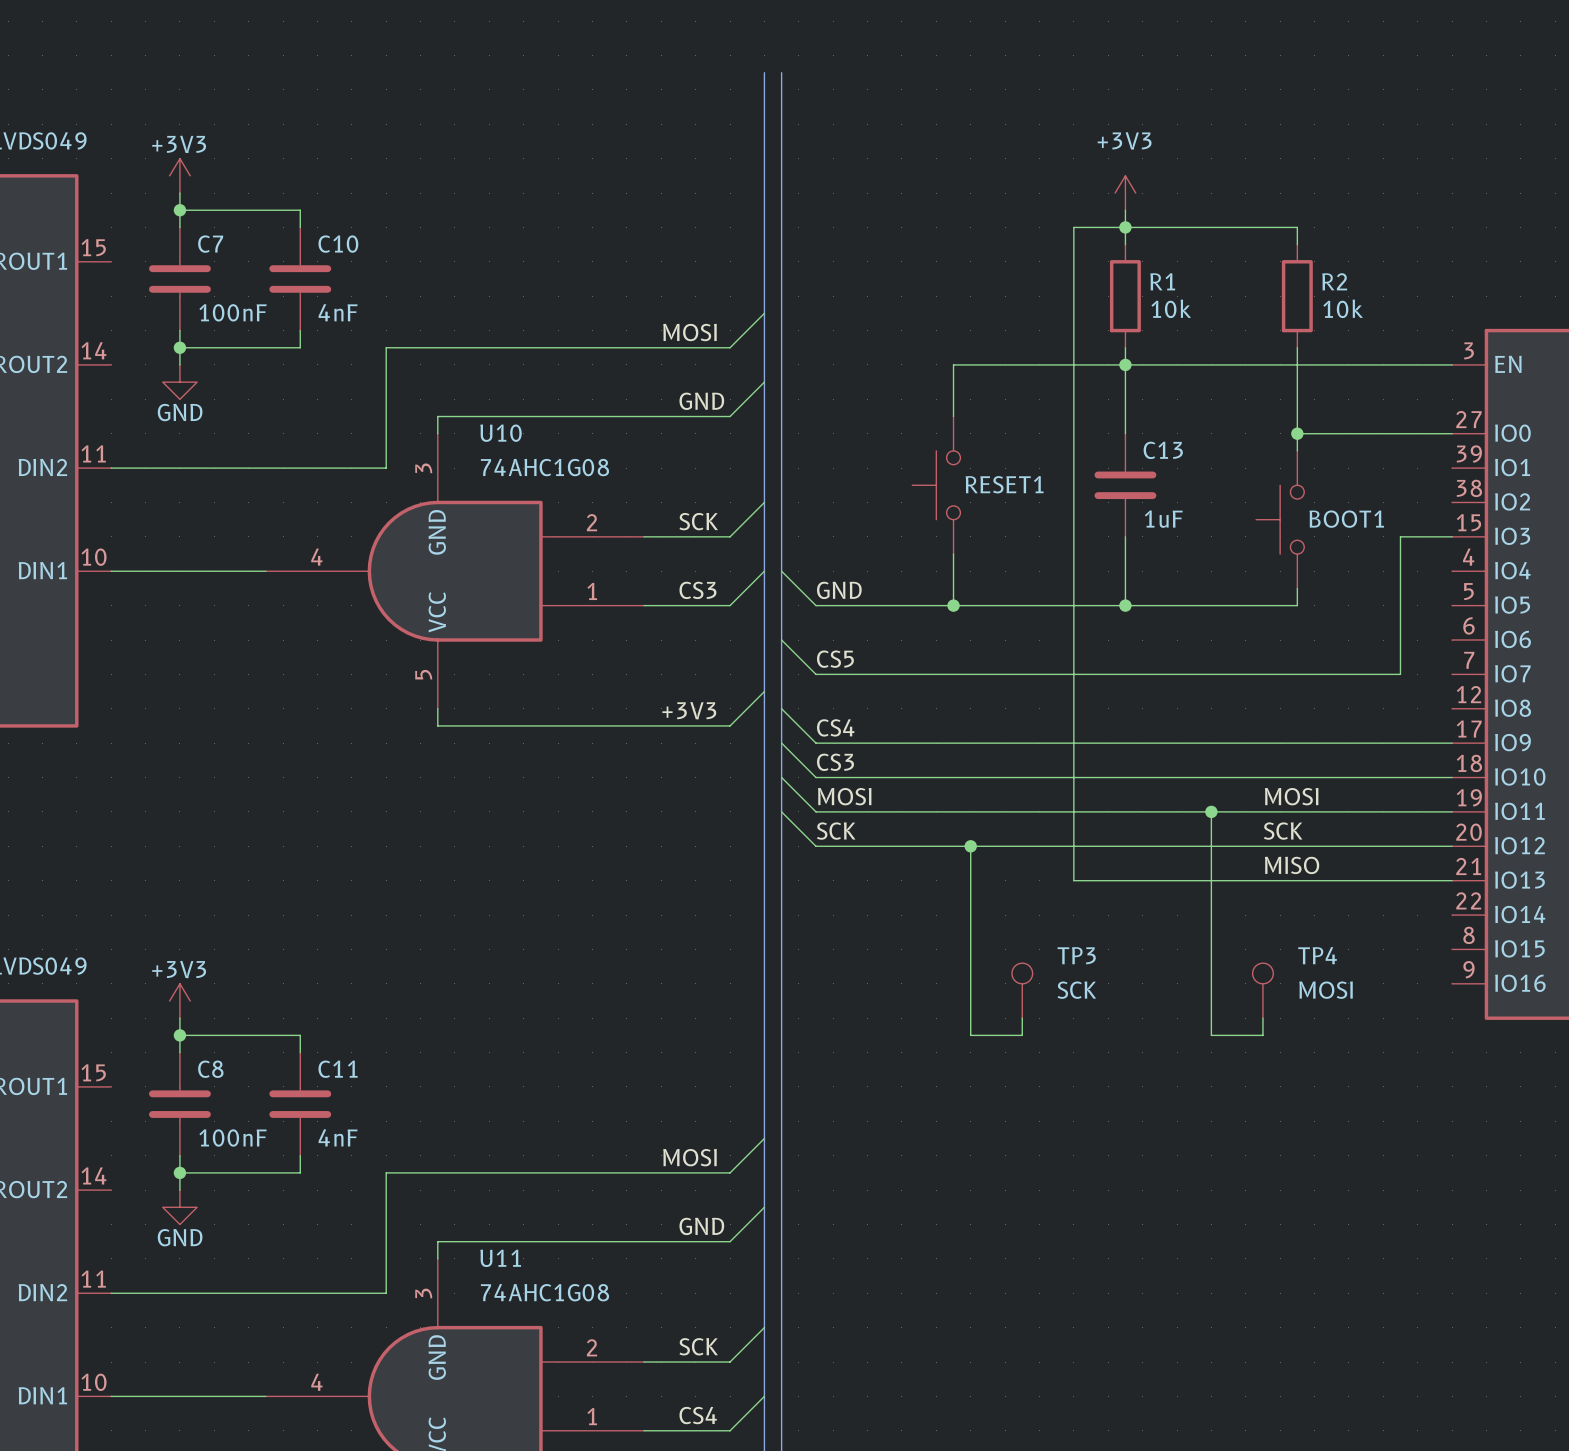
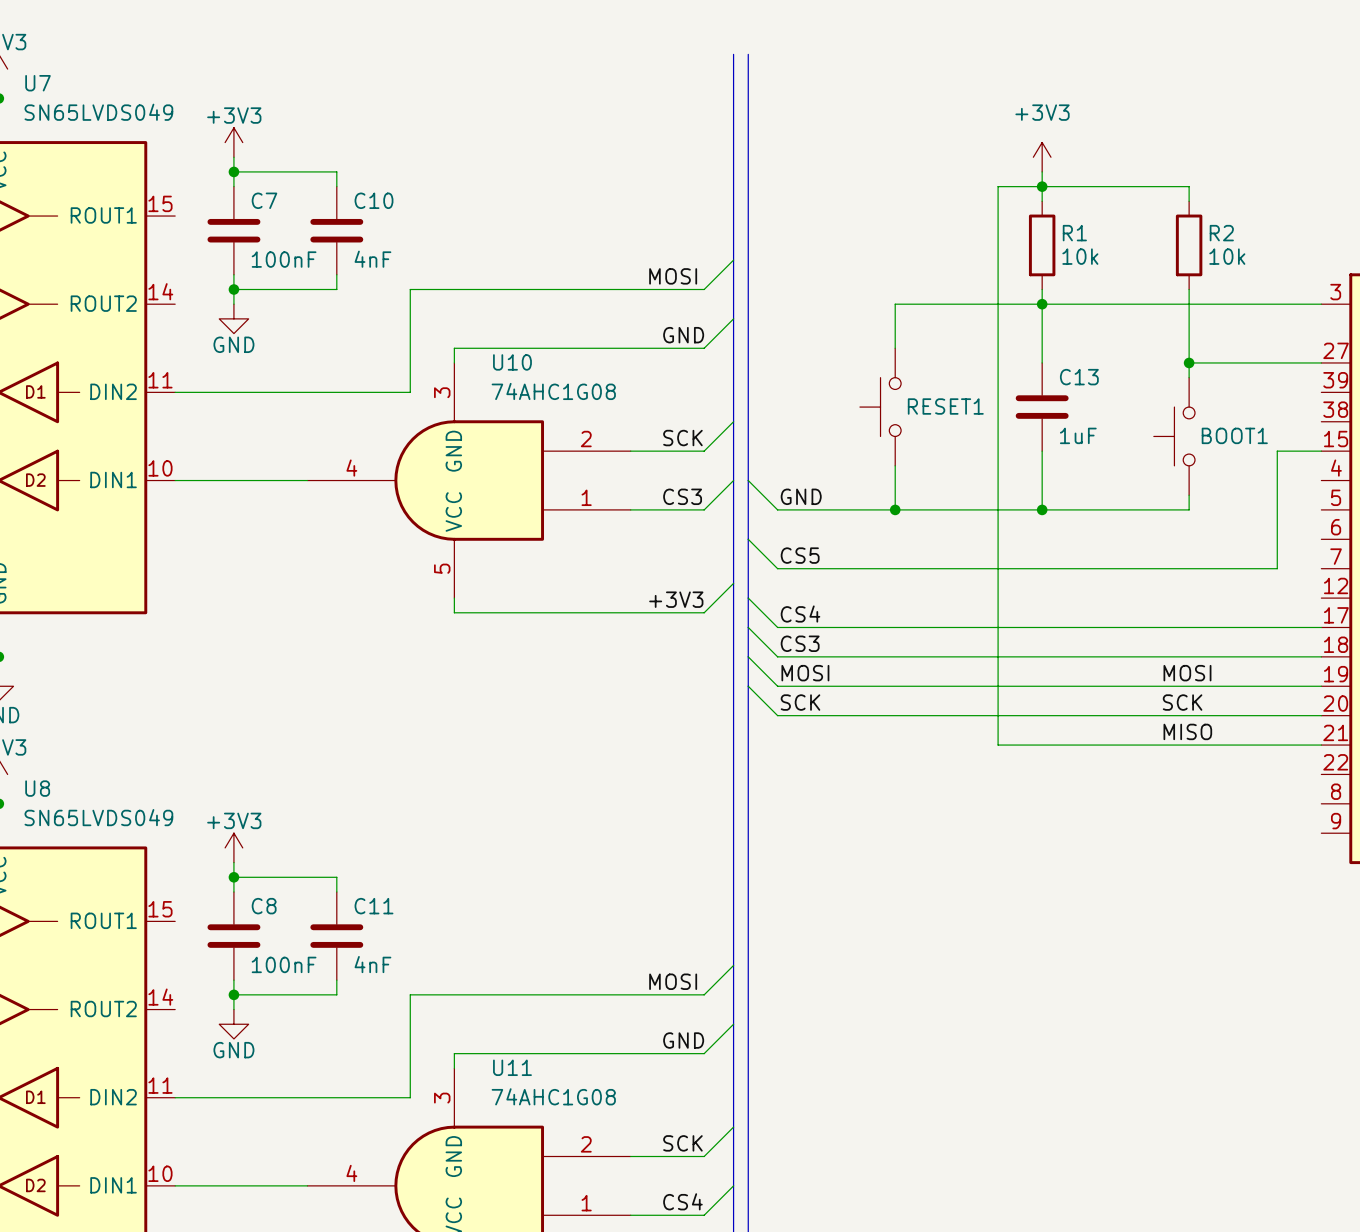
wire: (1211, 811) (1211, 1035) (1262, 1035) (1262, 1018) -> none
junction: (1211, 811) -> none
wire: (970, 846) (970, 1035) (1022, 1035) (1022, 1018) -> none
junction: (970, 846) -> none
TP3: SCK (1022, 990) -> none
TP4: MOSI (1262, 990) -> none

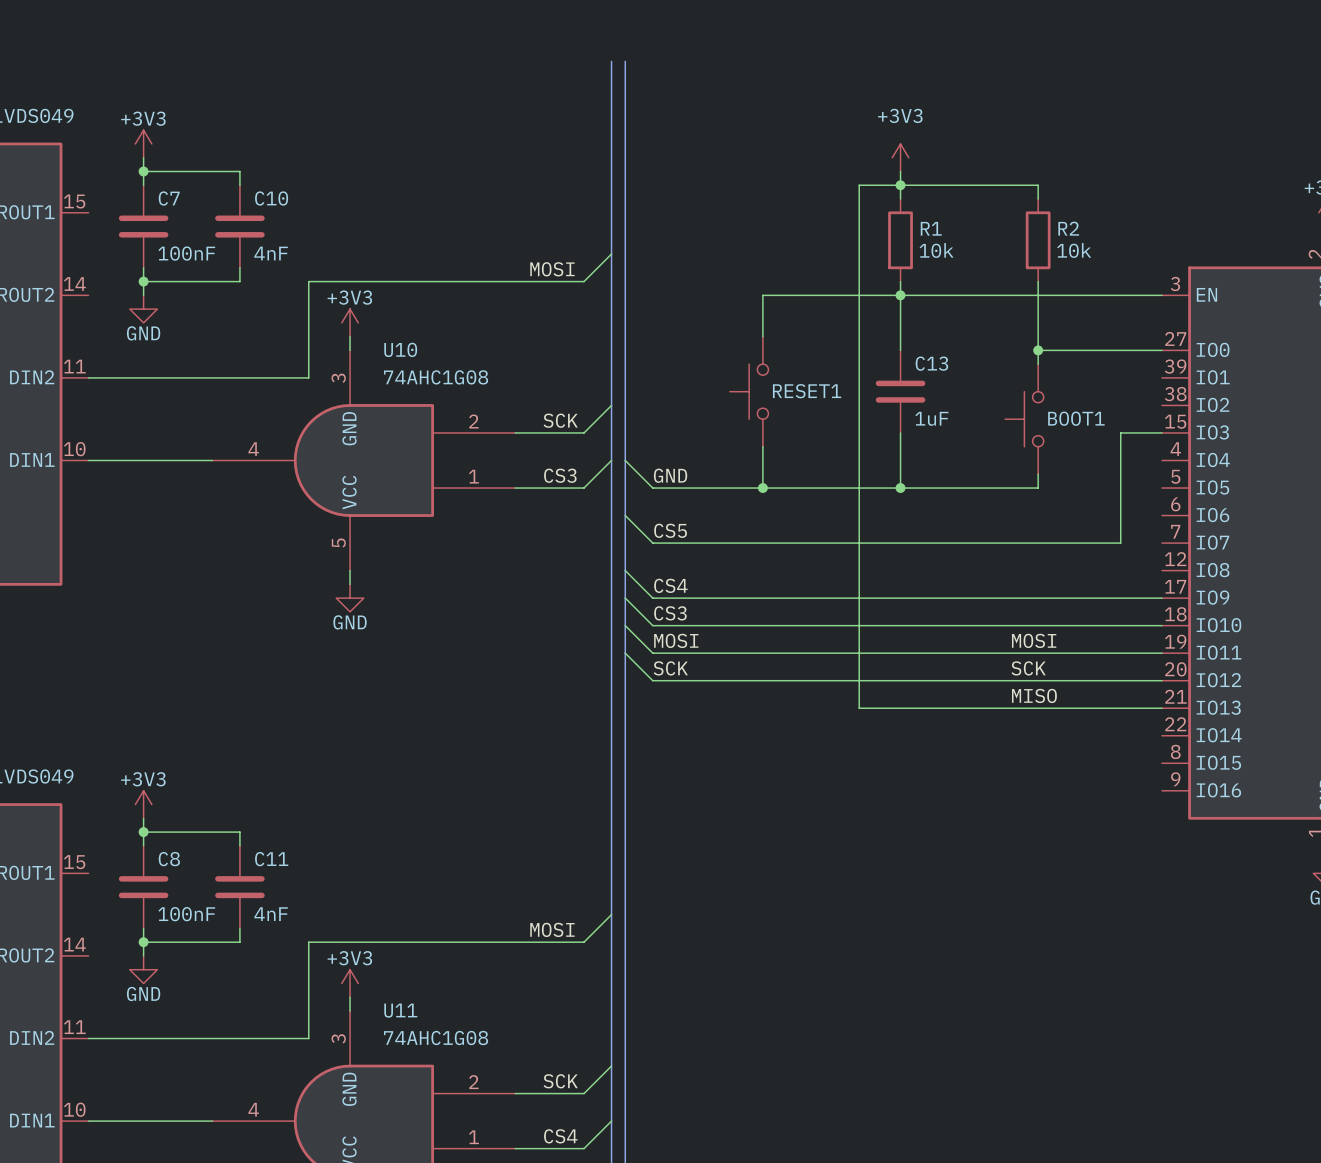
wire: (733, 318) (704, 348) (454, 348) -> none
power symbol: none -> +3V3 (350, 322)
label: GND (683, 335) -> none
wire: (733, 583) (704, 612) (454, 612) -> none
label: +3V3 (676, 599) -> none
power symbol: none -> GND (350, 598)
wire: (733, 1024) (704, 1053) (454, 1053) -> none
power symbol: none -> +3V3 (350, 983)
label: GND (683, 1040) -> none

